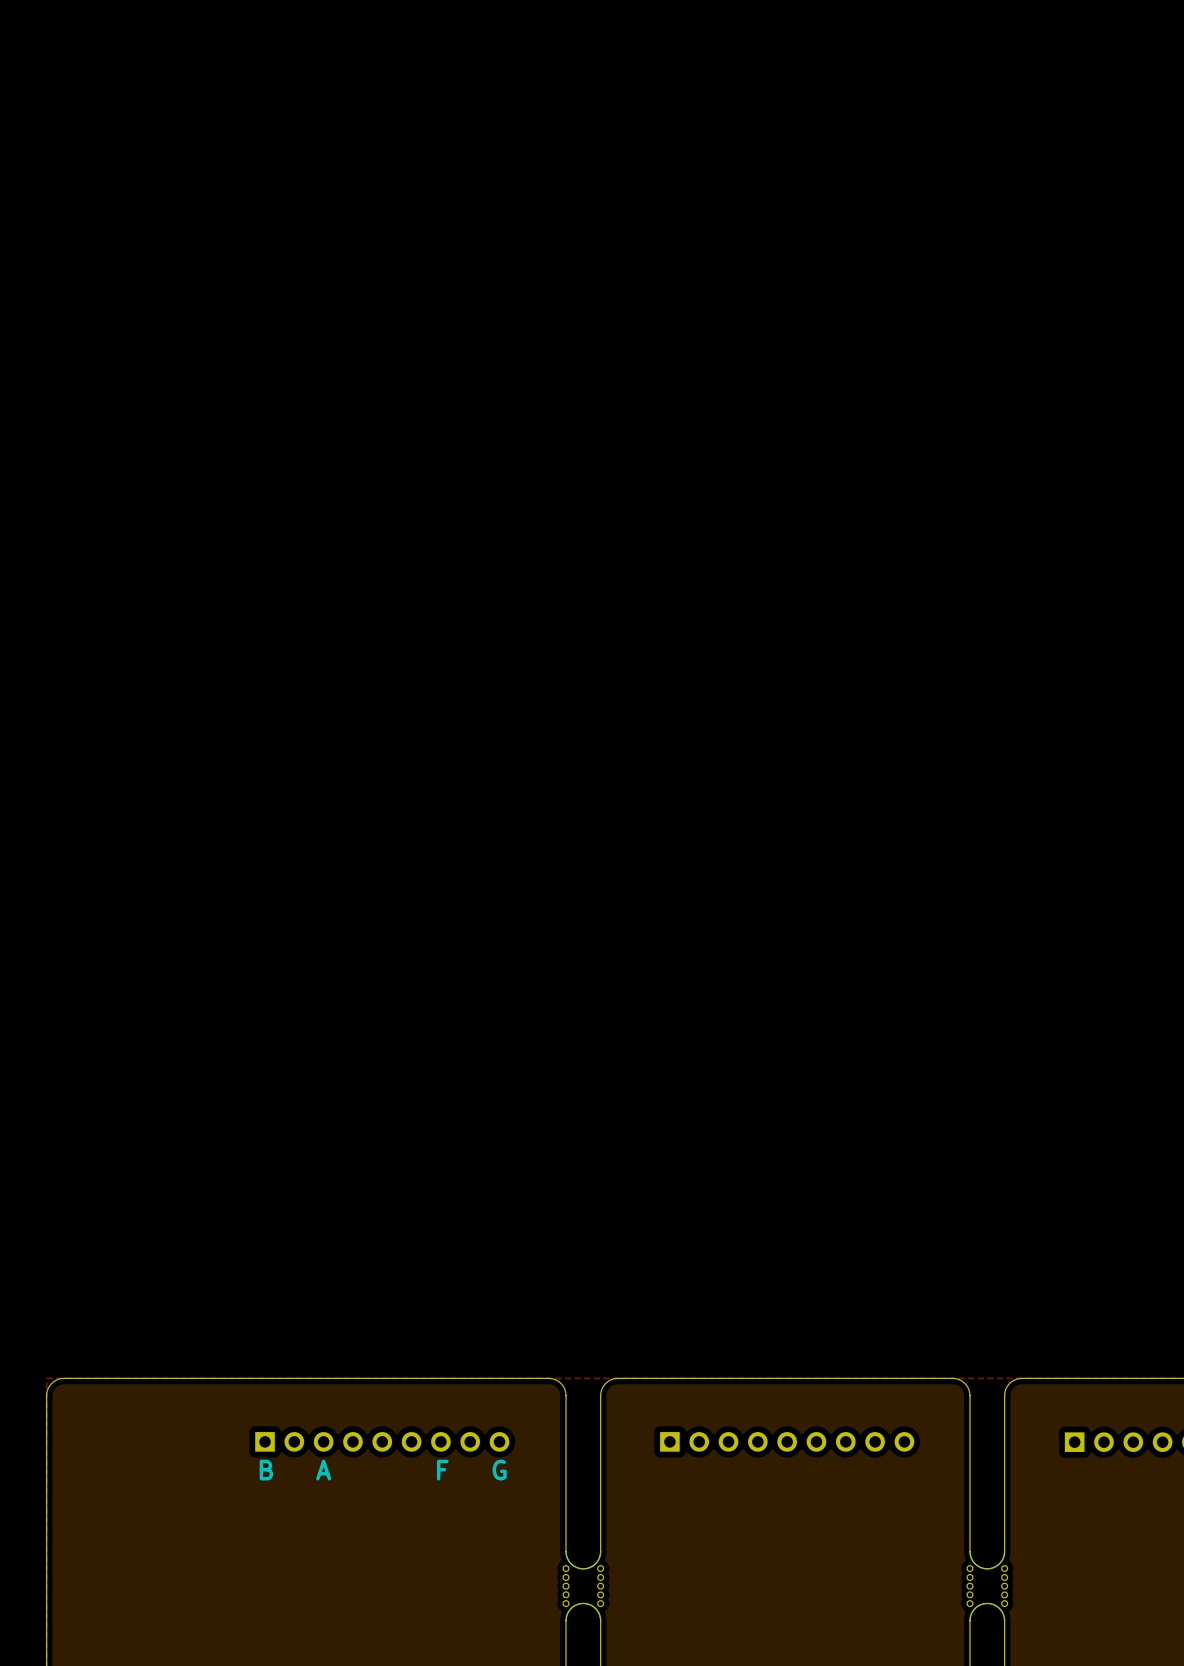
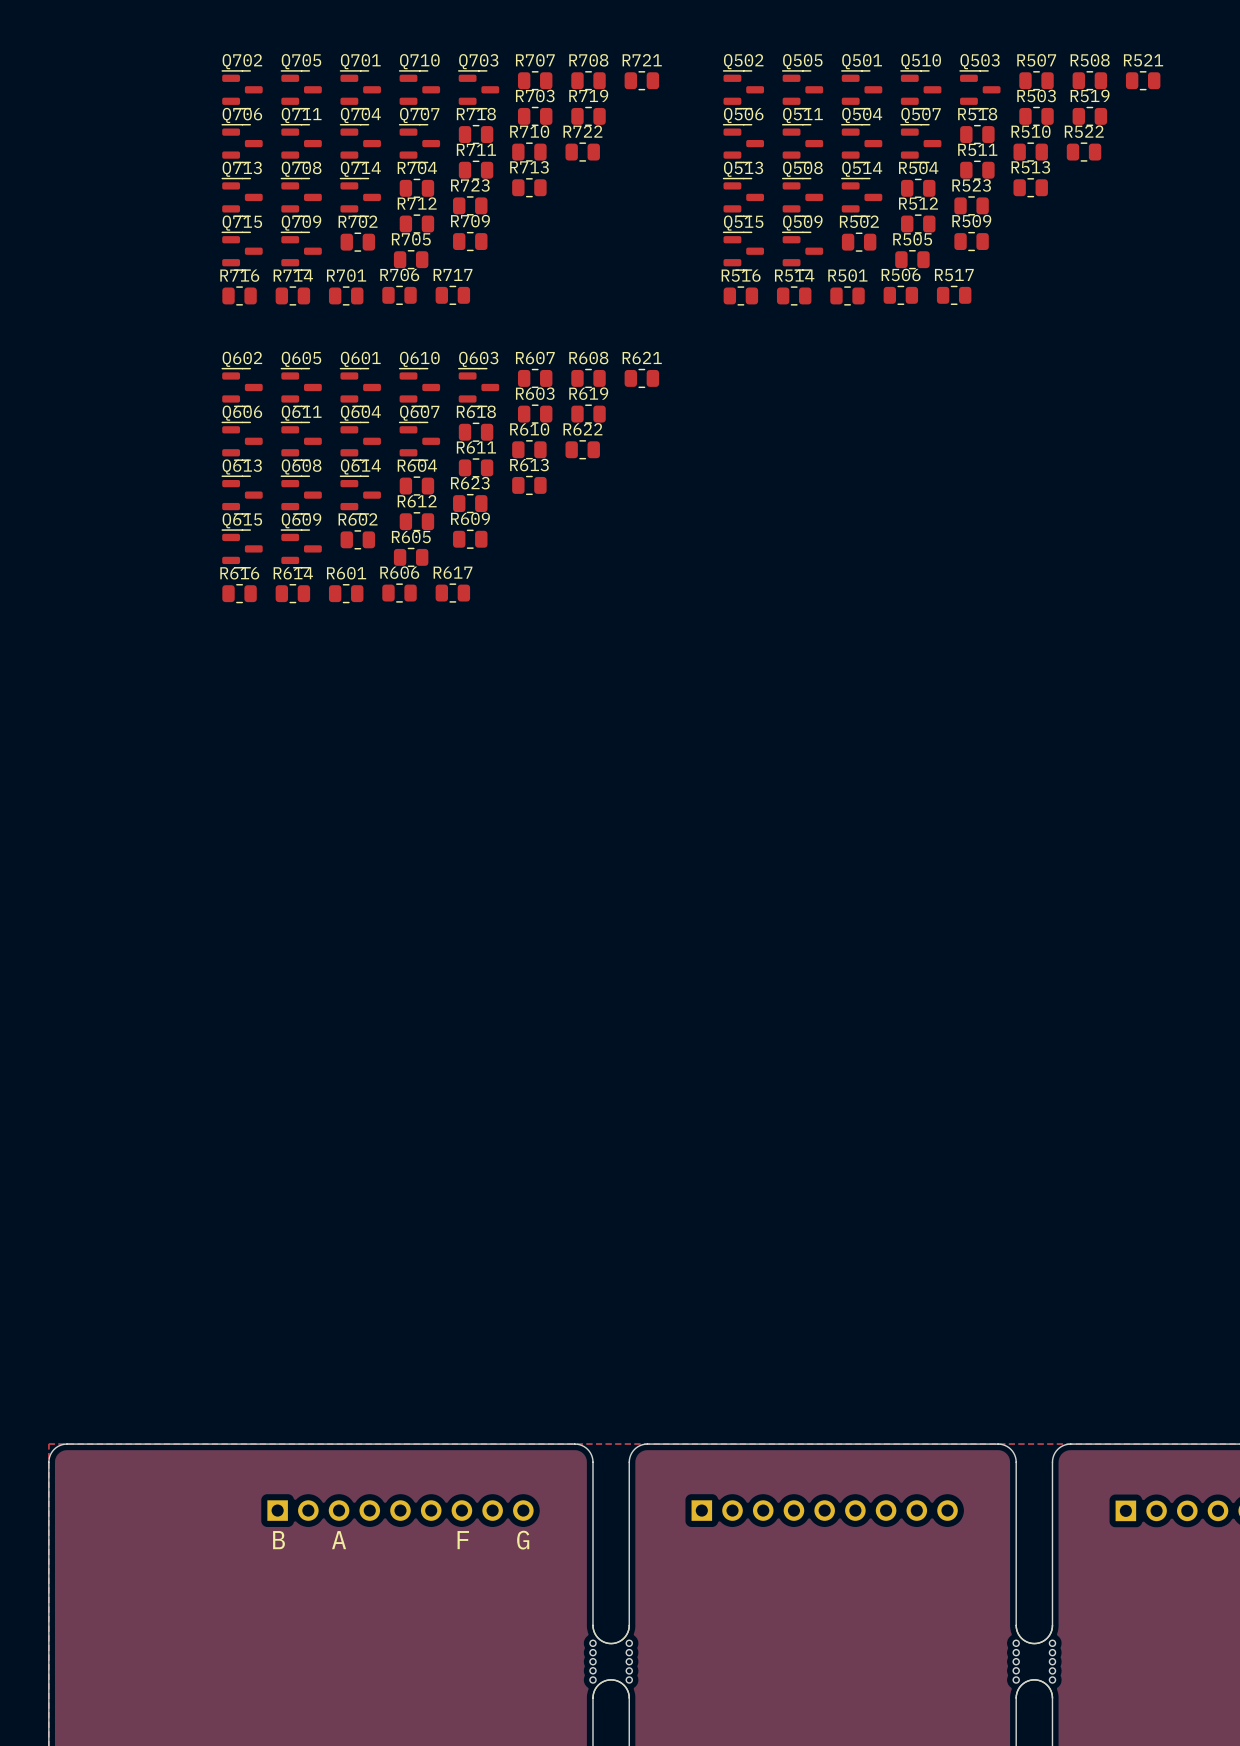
R707: none -> (535, 80)
R708: none -> (588, 80)
R721: none -> (641, 80)
R507: none -> (1036, 80)
R508: none -> (1089, 80)
R521: none -> (1143, 80)
Q702: none -> (242, 89)
Q705: none -> (301, 89)
Q701: none -> (360, 89)
Q710: none -> (419, 89)
Q703: none -> (478, 89)
Q502: none -> (743, 89)
Q505: none -> (802, 89)
Q501: none -> (861, 89)
Q510: none -> (920, 89)
Q503: none -> (979, 89)
R703: none -> (535, 116)
R719: none -> (588, 116)
R503: none -> (1036, 116)
R519: none -> (1089, 116)
R718: none -> (476, 134)
R518: none -> (977, 134)
Q706: none -> (242, 143)
Q711: none -> (301, 143)
Q704: none -> (360, 143)
Q707: none -> (419, 143)
Q506: none -> (743, 143)
Q511: none -> (802, 143)
Q504: none -> (861, 143)
Q507: none -> (920, 143)
R710: none -> (529, 152)
R722: none -> (582, 152)
R510: none -> (1030, 152)
R522: none -> (1084, 152)
R711: none -> (476, 170)
R511: none -> (977, 170)
R704: none -> (416, 188)
R713: none -> (529, 187)
R504: none -> (918, 188)
R513: none -> (1030, 187)
Q713: none -> (242, 197)
Q708: none -> (301, 197)
Q714: none -> (360, 197)
Q513: none -> (743, 197)
Q508: none -> (802, 197)
Q514: none -> (861, 197)
R723: none -> (470, 205)
R523: none -> (971, 205)
R712: none -> (416, 224)
R512: none -> (918, 224)
R709: none -> (470, 241)
R509: none -> (971, 241)
R702: none -> (357, 242)
R502: none -> (859, 242)
Q715: none -> (242, 251)
Q709: none -> (301, 251)
Q515: none -> (743, 251)
Q509: none -> (802, 251)
R705: none -> (411, 259)
R505: none -> (912, 259)
R706: none -> (399, 295)
R717: none -> (452, 295)
R506: none -> (900, 295)
R517: none -> (954, 295)
R716: none -> (239, 295)
R714: none -> (292, 295)
R701: none -> (346, 295)
R516: none -> (740, 295)
R514: none -> (794, 295)
R501: none -> (847, 295)
R607: none -> (535, 378)
R608: none -> (588, 378)
R621: none -> (641, 378)
Q602: none -> (242, 387)
Q605: none -> (301, 387)
Q601: none -> (360, 387)
Q610: none -> (419, 387)
Q603: none -> (478, 387)
R603: none -> (535, 414)
R619: none -> (588, 414)
R618: none -> (476, 432)
Q606: none -> (242, 441)
Q611: none -> (301, 441)
Q604: none -> (360, 441)
Q607: none -> (419, 441)
R610: none -> (529, 449)
R622: none -> (582, 449)
R611: none -> (476, 467)
R604: none -> (416, 486)
R613: none -> (529, 485)
Q613: none -> (242, 495)
Q608: none -> (301, 495)
Q614: none -> (360, 495)
R623: none -> (470, 503)
R612: none -> (416, 521)
R609: none -> (470, 539)
R602: none -> (357, 539)
Q615: none -> (242, 548)
Q609: none -> (301, 548)
R605: none -> (411, 557)
R616: none -> (239, 593)
R614: none -> (292, 593)
R601: none -> (346, 593)
R606: none -> (399, 593)
R617: none -> (452, 593)

